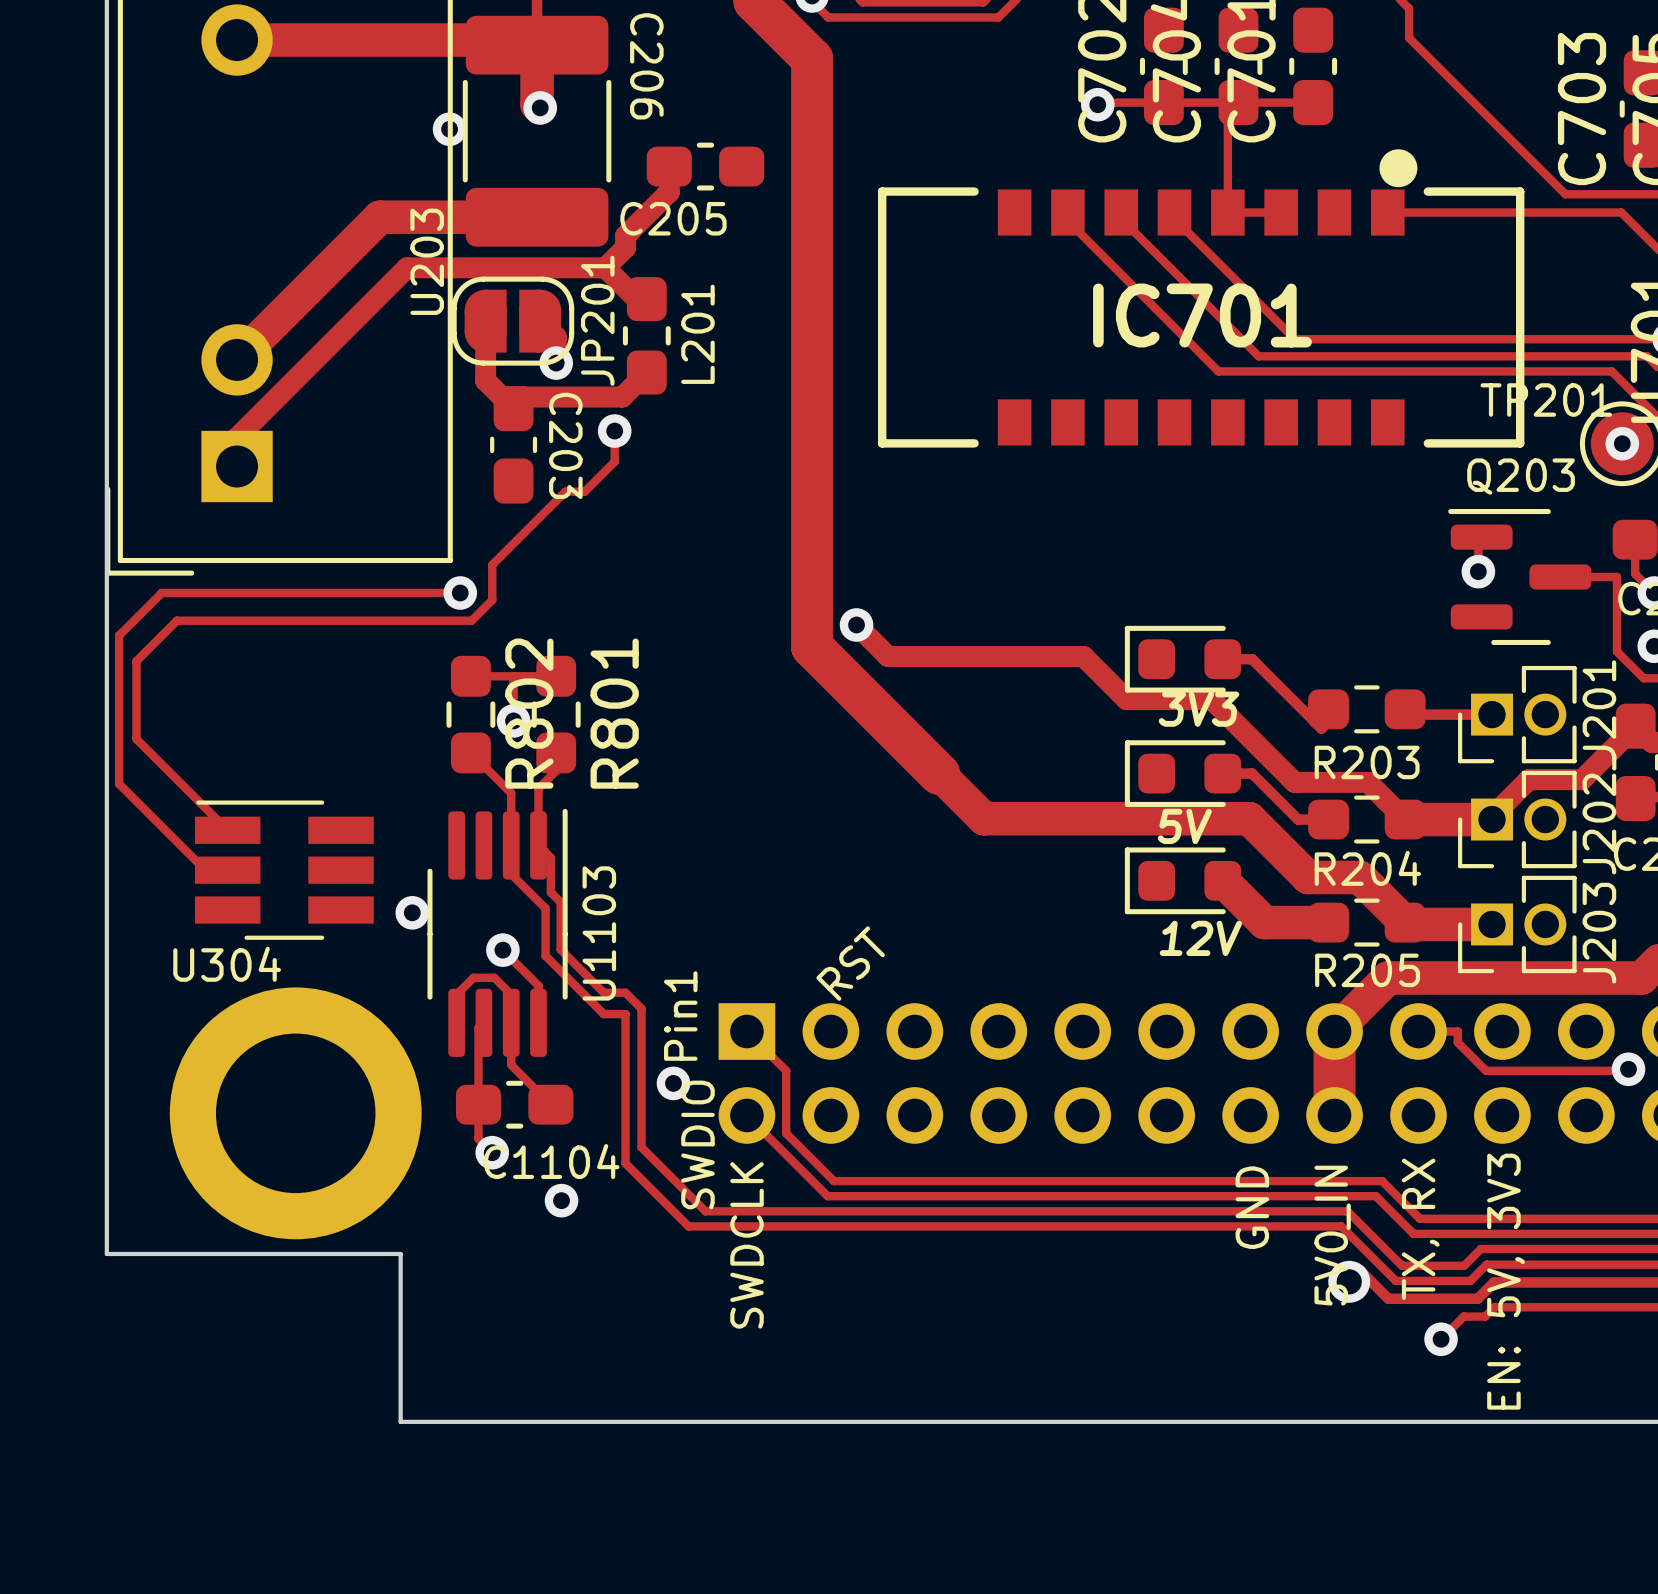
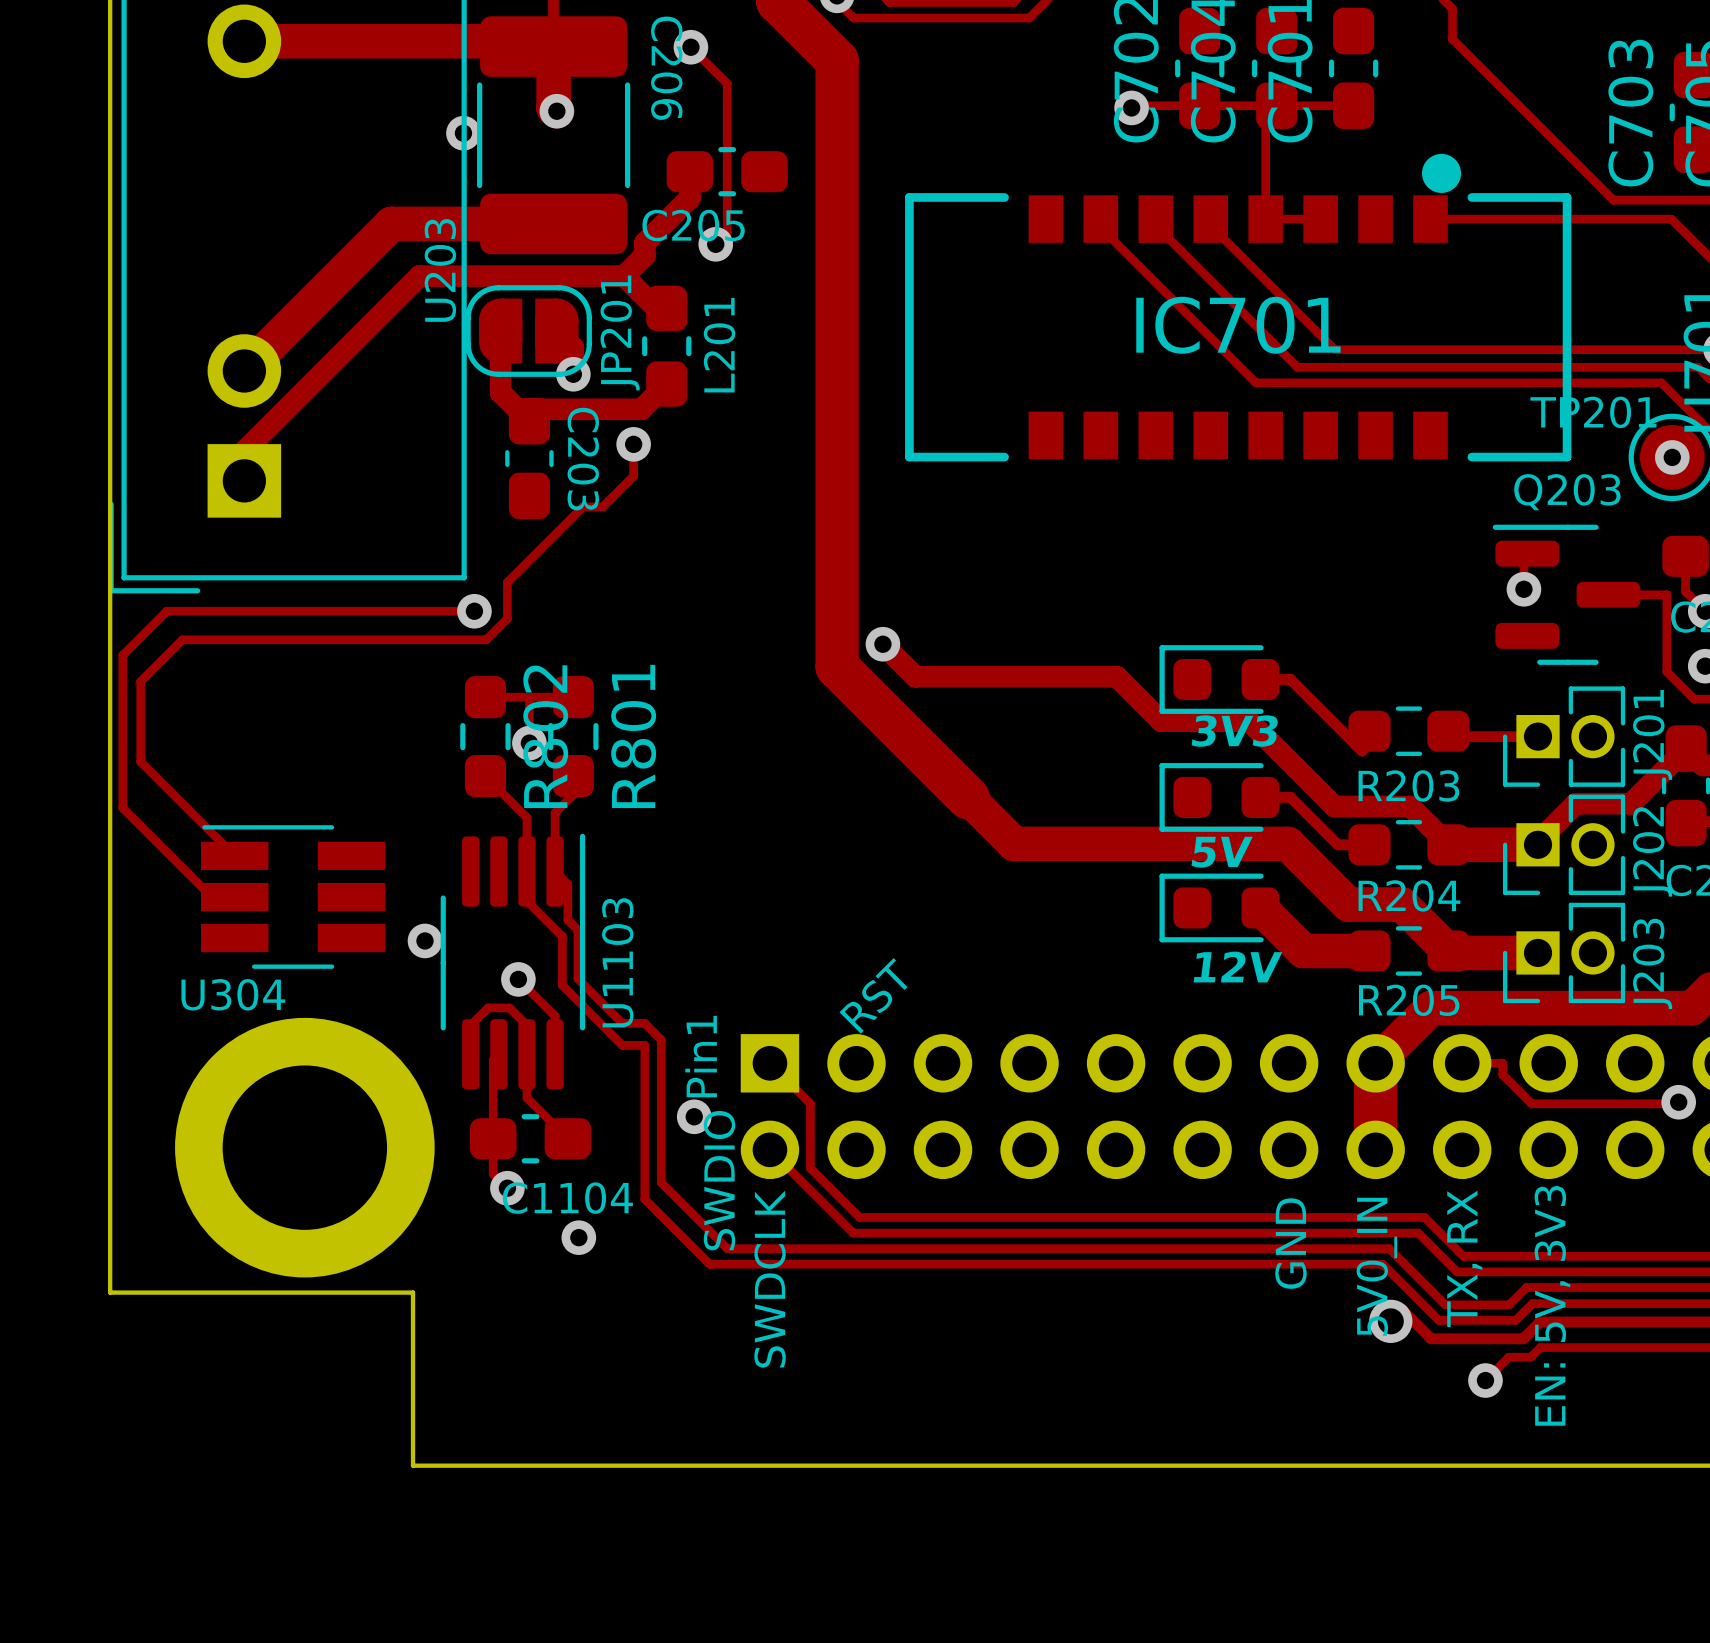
track: none -> (690, 47) (727, 83) (727, 232) (715, 244)
via: none -> (690, 47)
via: none -> (715, 244)

